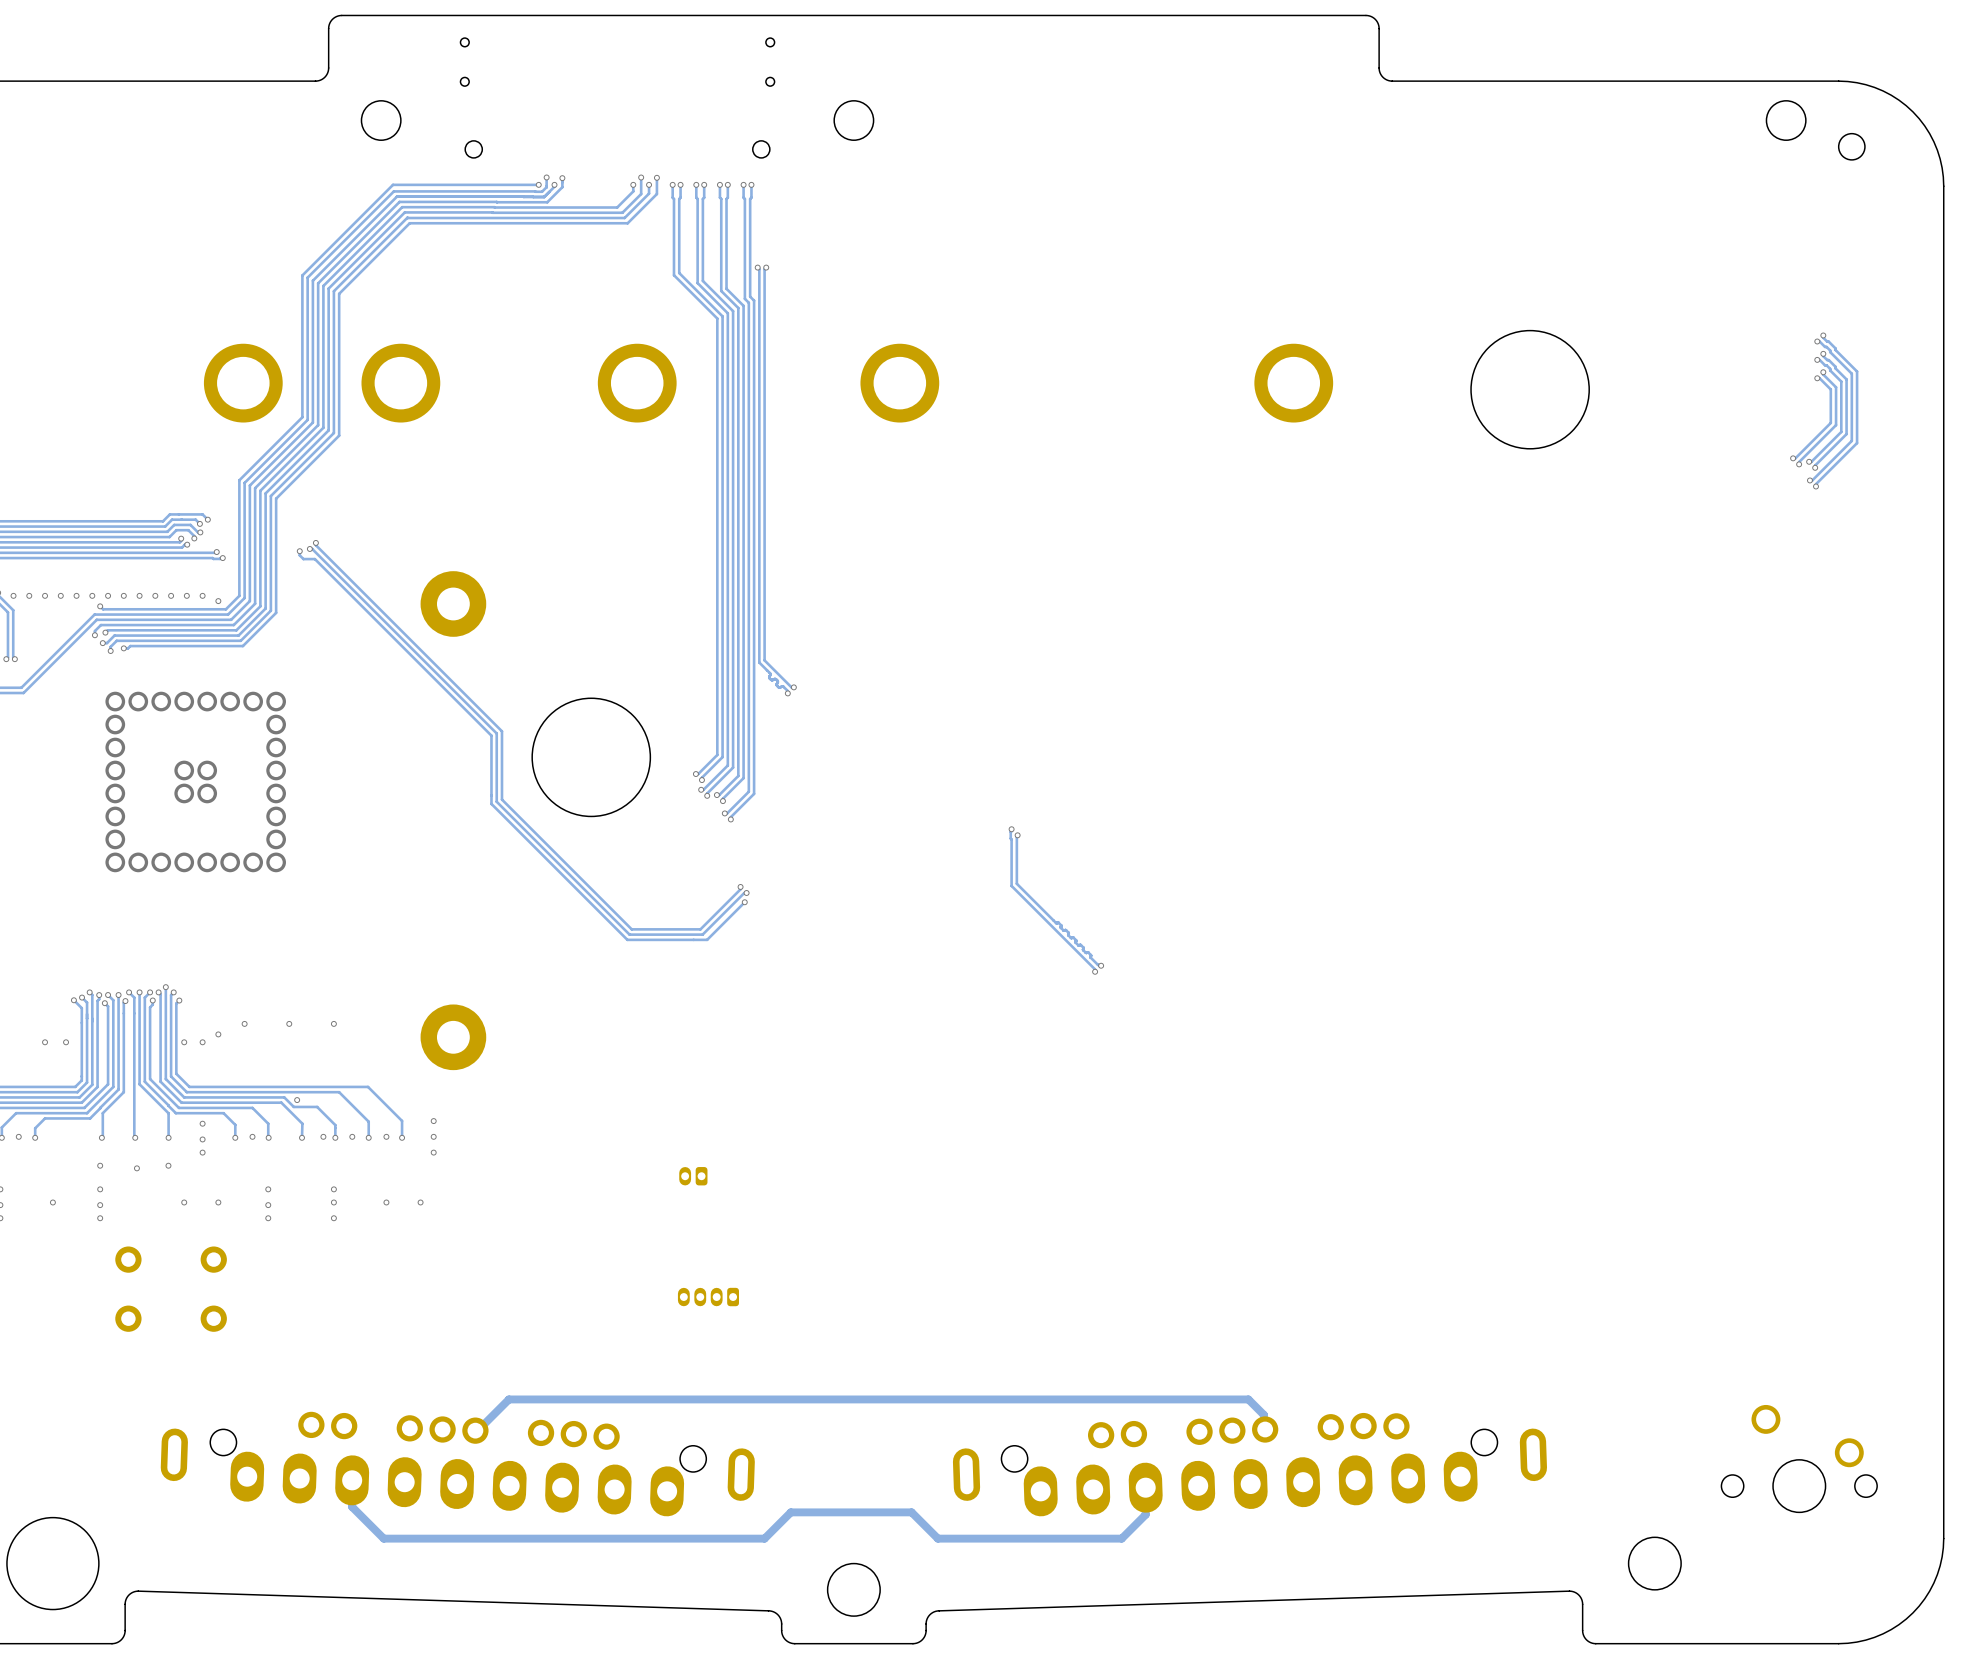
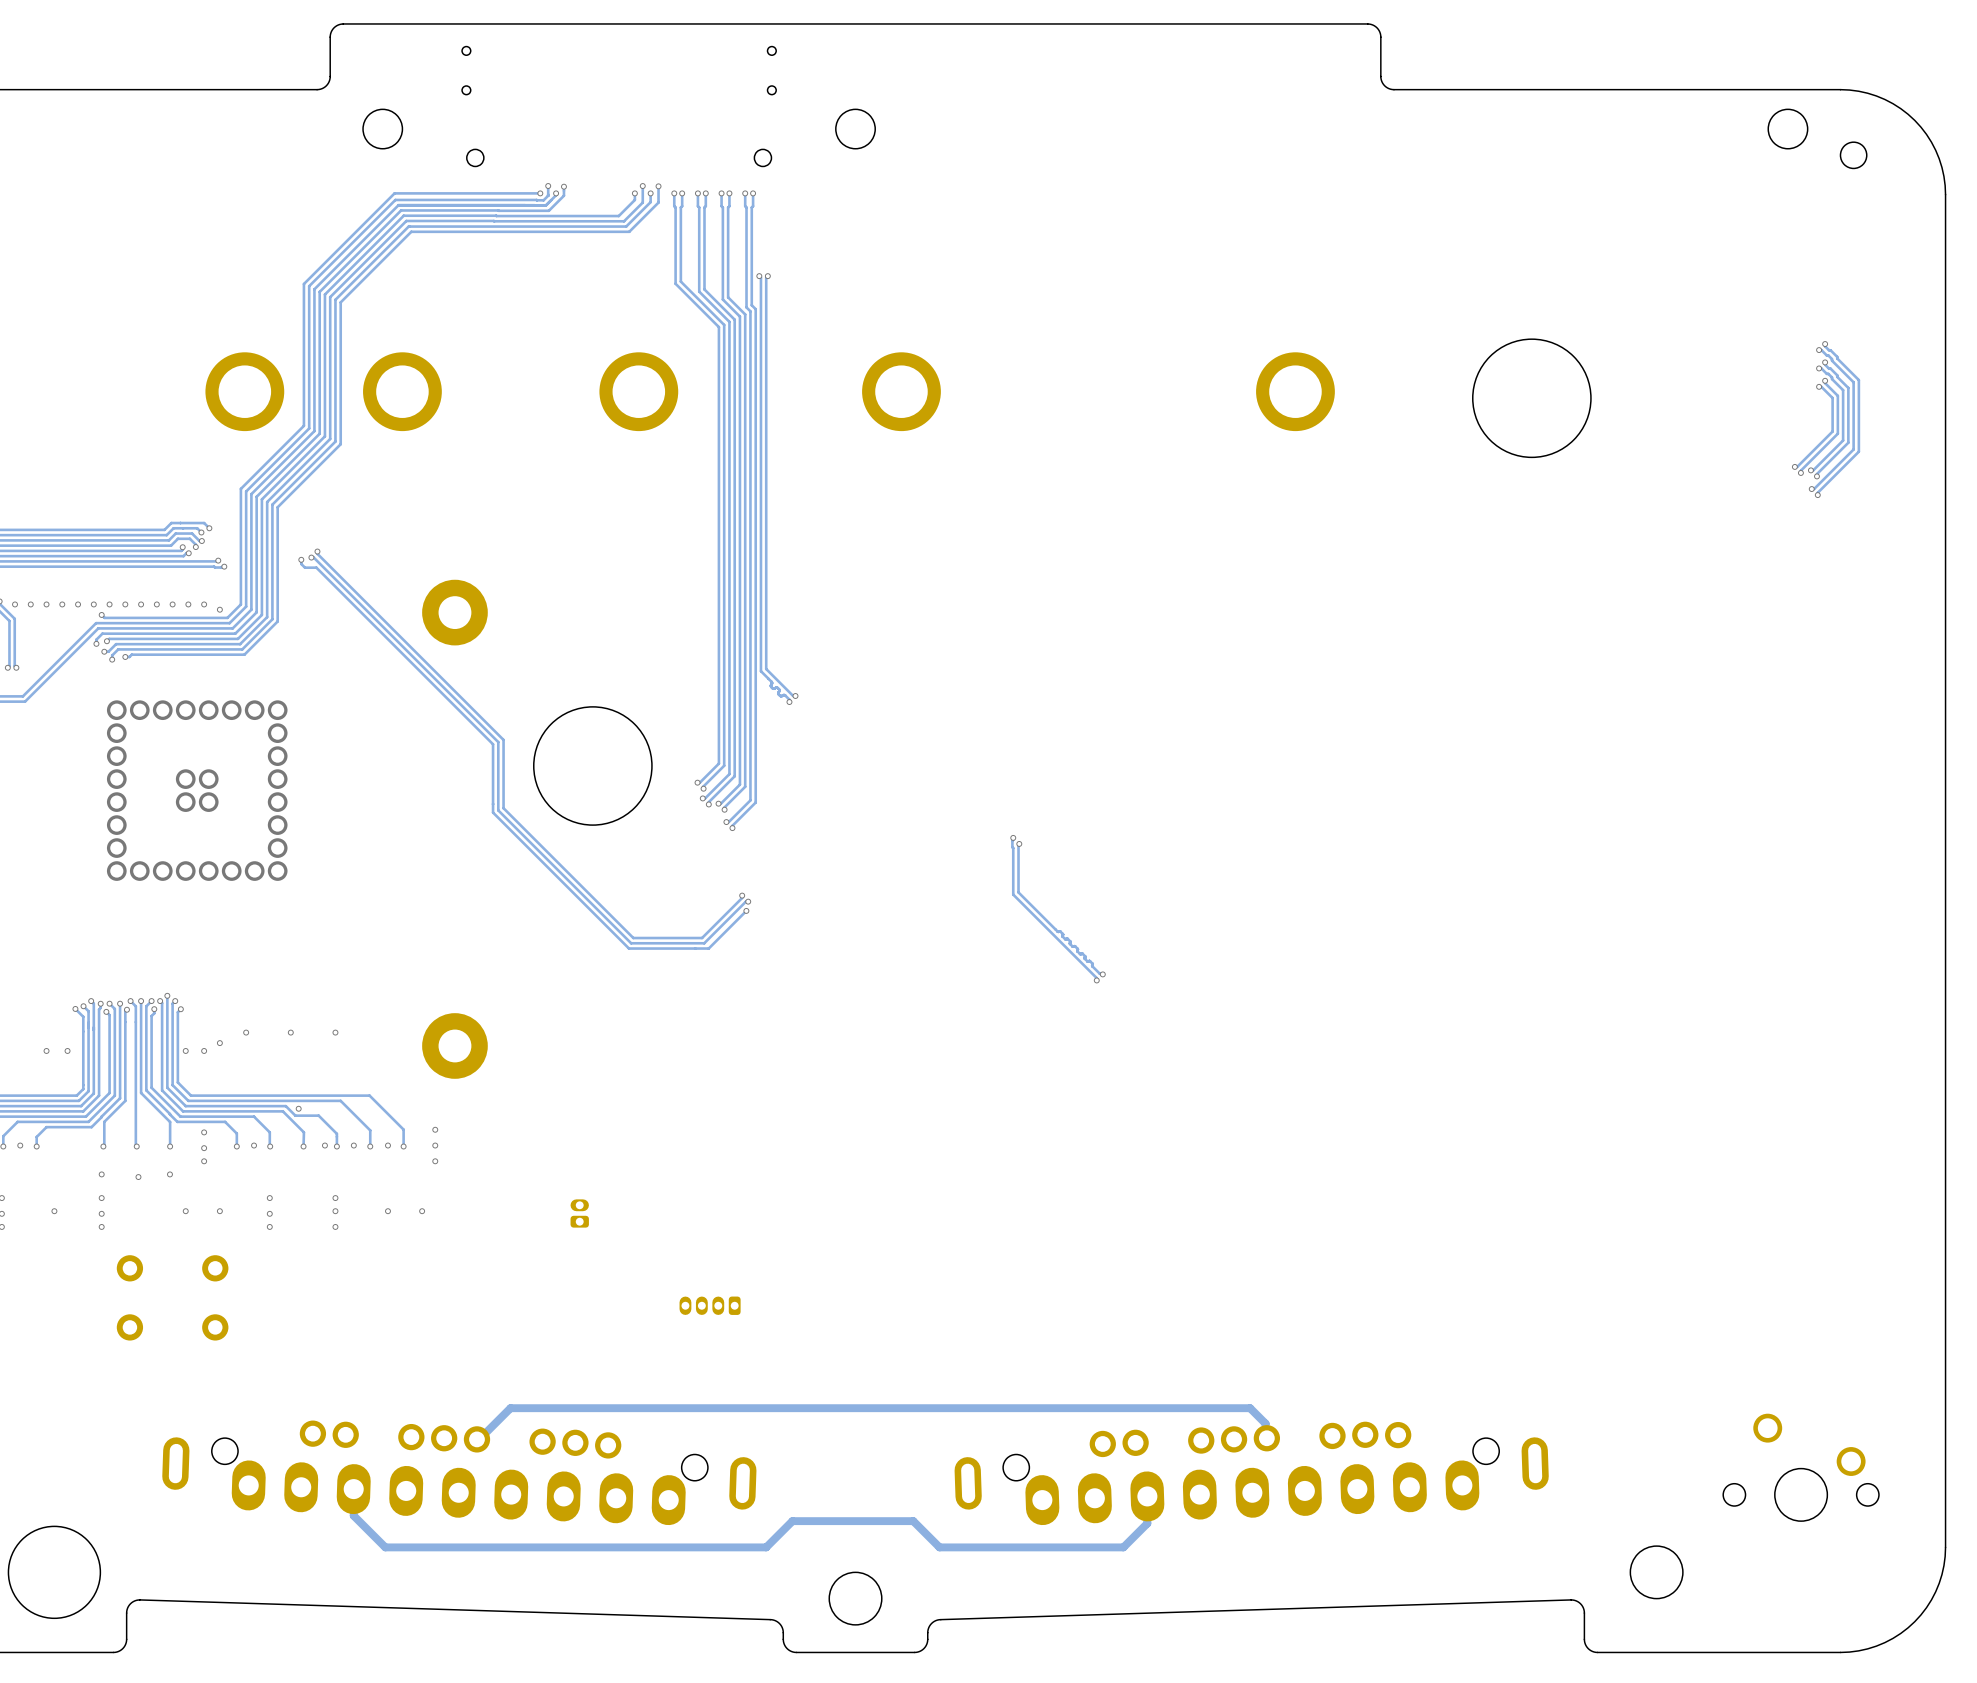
part rotation: 0° (693, 1176) -> 90° clockwise (579, 1213)
part position: (693, 1176) -> (579, 1213)

